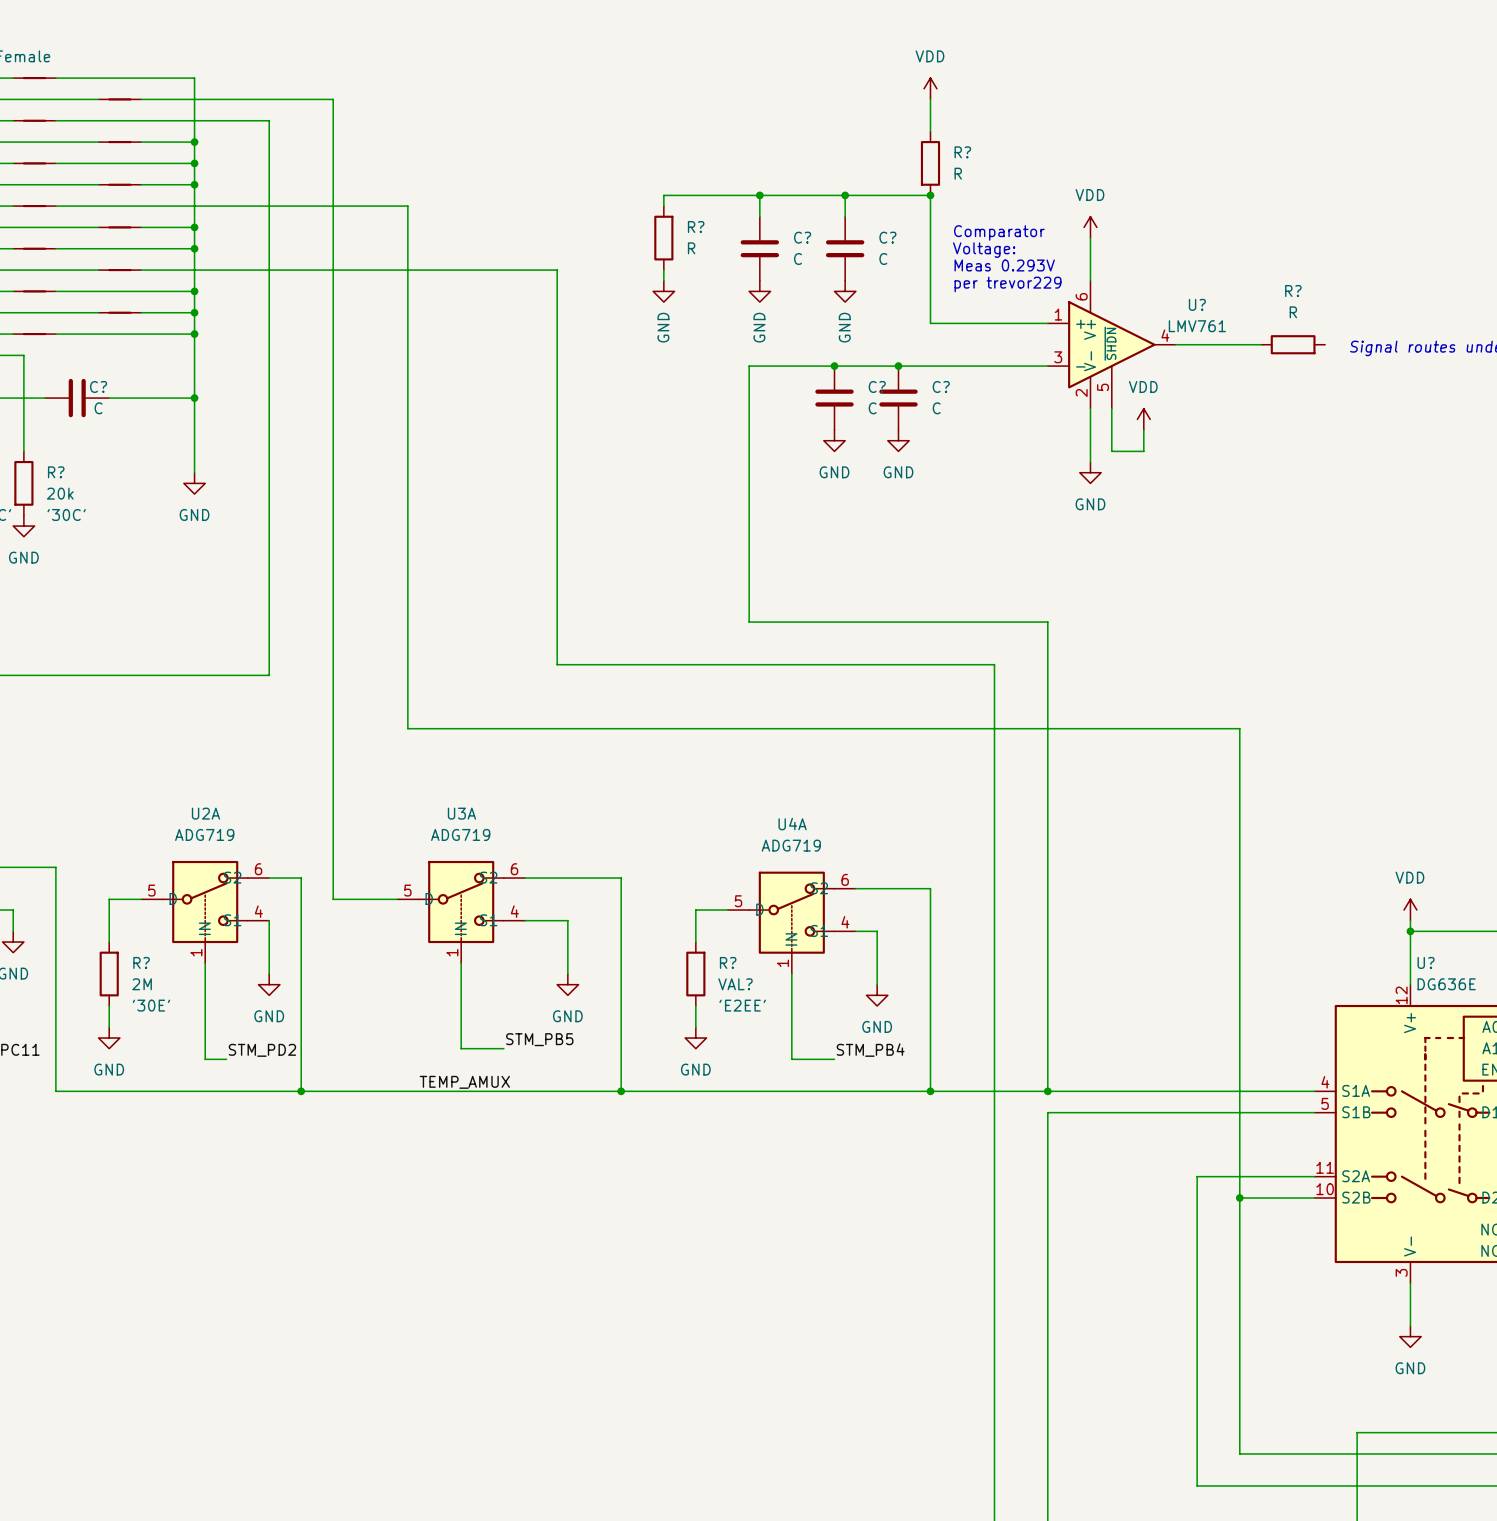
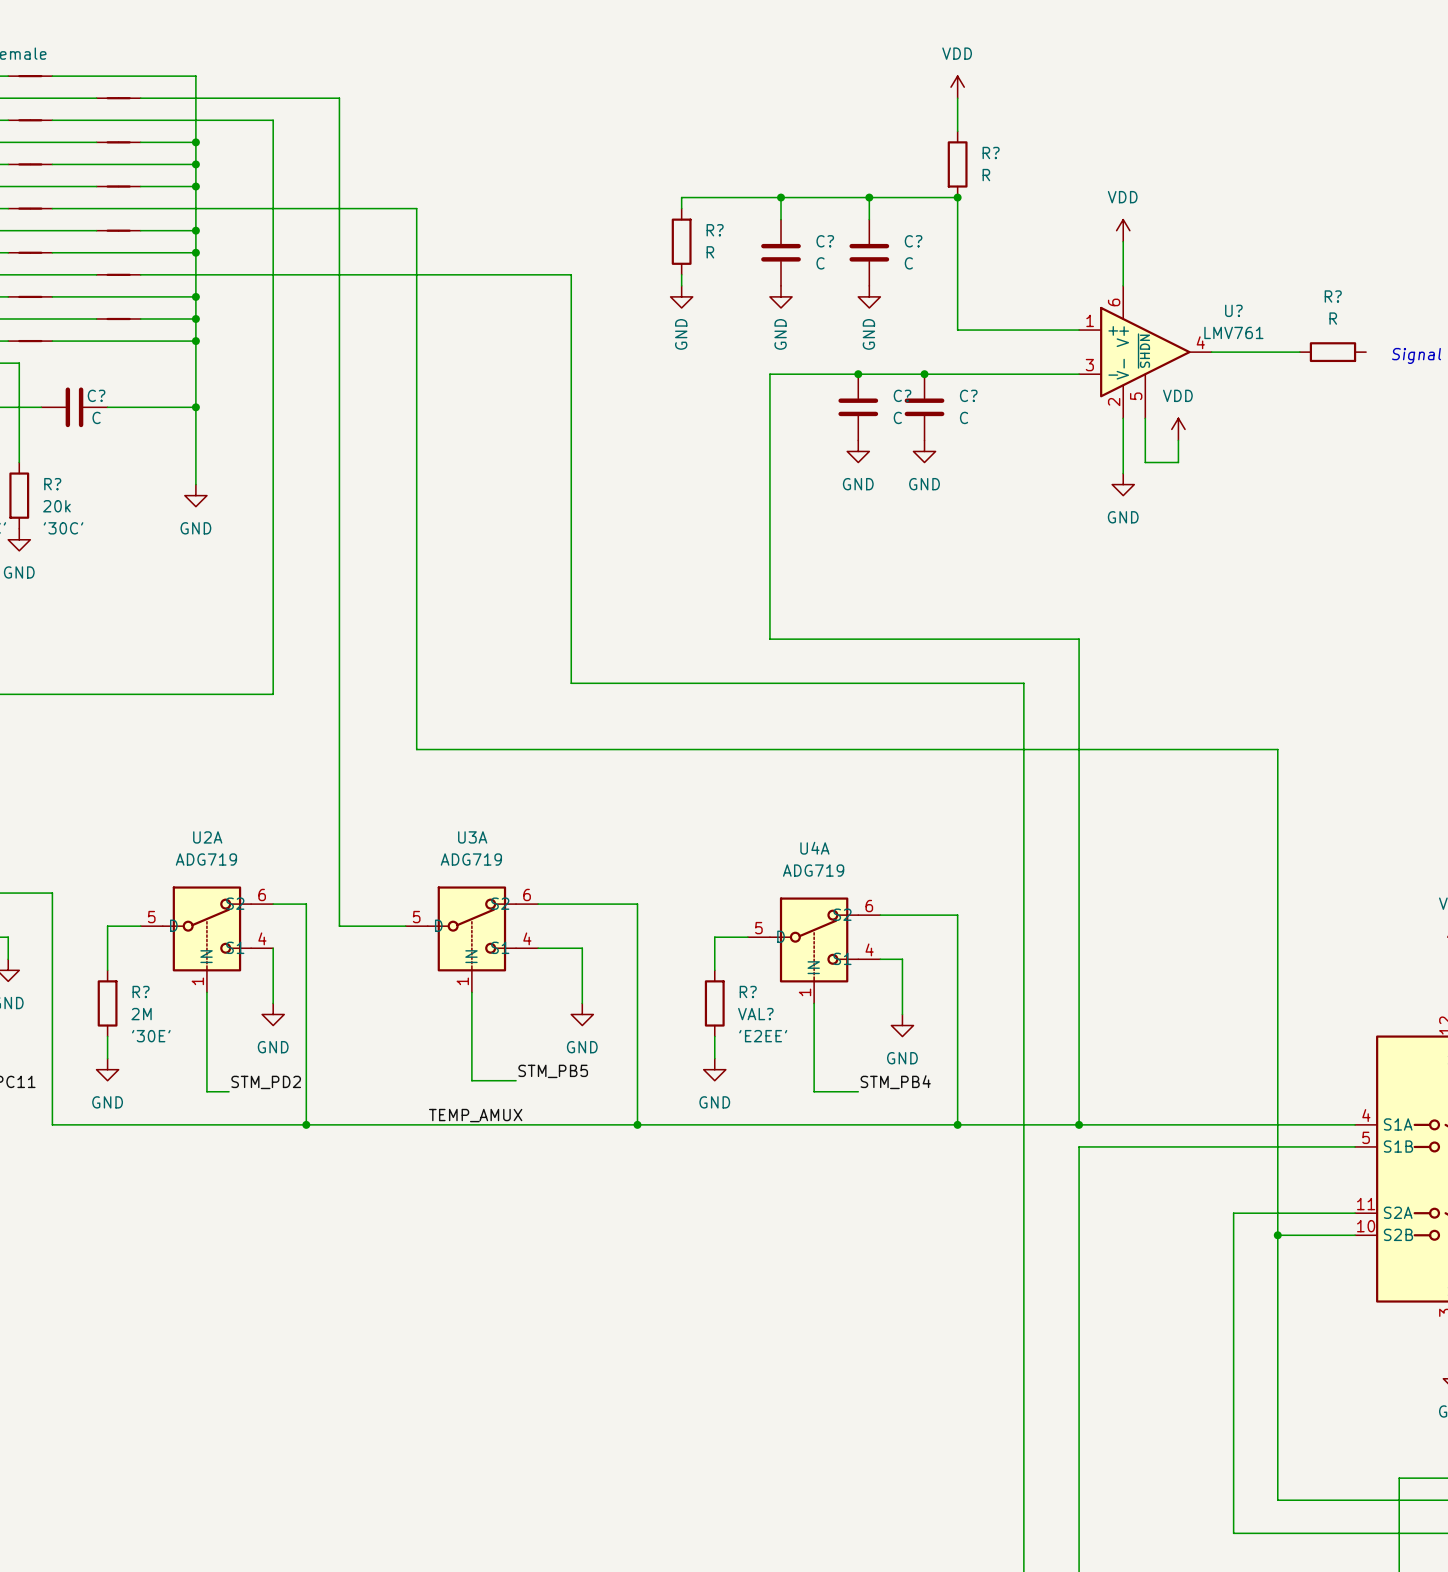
text: Comparator (999, 232) -> none
text: Voltage: (984, 250) -> none
text: Meas 0.293V (1004, 265) -> none
text: per trevor229 (1008, 284) -> none

